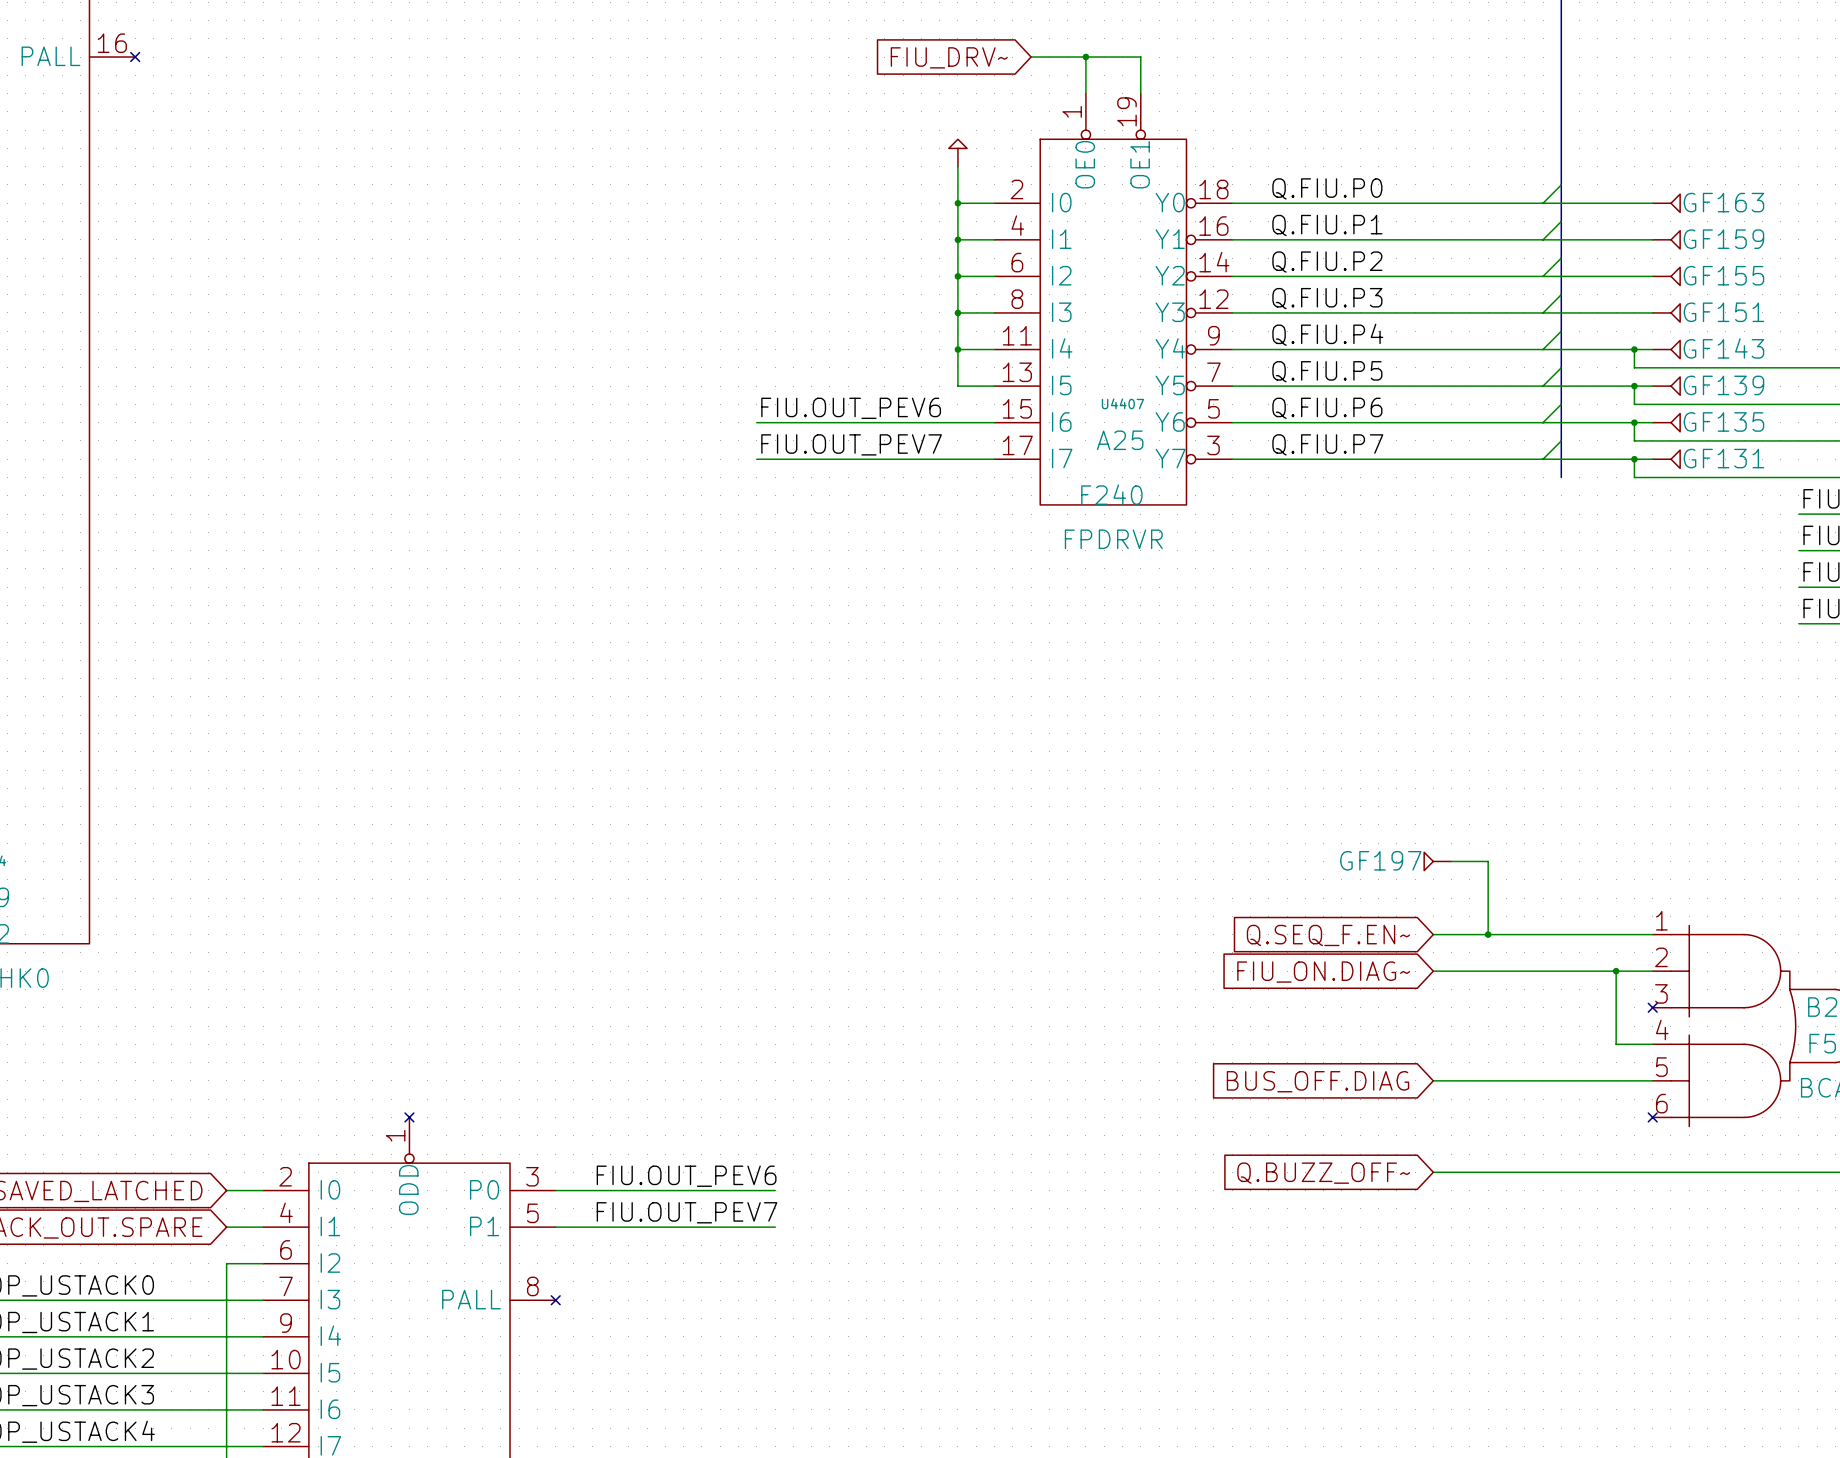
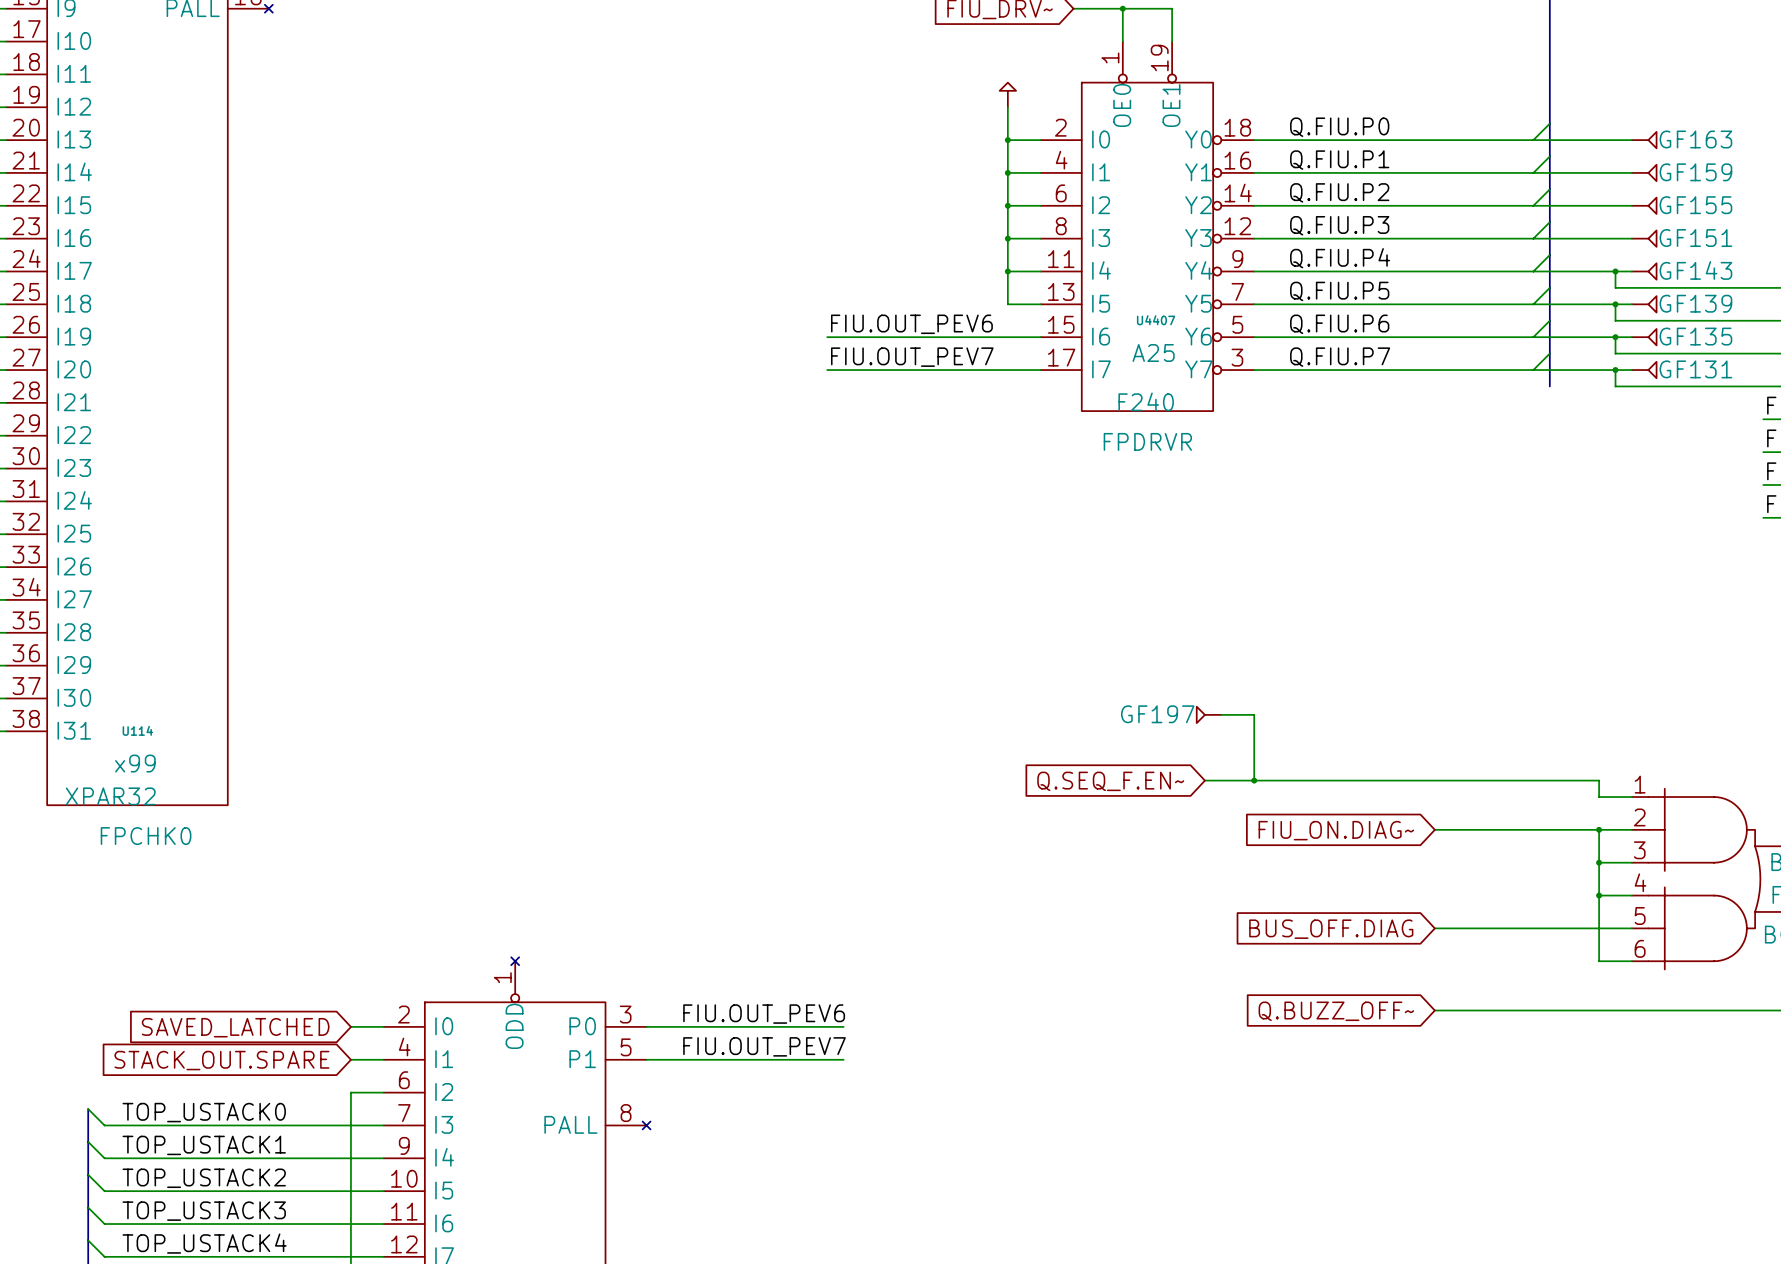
wire: none -> (1221, 714) (1254, 714) (1254, 780)
GF197 position: (1437, 861) -> (1208, 714)
wire: (1451, 861) (1488, 861) (1488, 934) -> none
junction: none -> (1254, 780)
global label: none -> Q.SEQ_F.EN~ (1110, 781)
wire: (1433, 934) (1616, 934) -> (1204, 780) (1599, 780) (1599, 797)
junction: (1488, 934) -> none
global label: Q.SEQ_F.EN~ (1328, 935) -> none
wire: none -> (1599, 862) (1631, 862)
junction: none -> (1599, 862)
no-connect mark: (1652, 1007) -> none
wire: none -> (1599, 895) (1599, 961) (1631, 961)
junction: none -> (1599, 895)
no-connect mark: (1652, 1117) -> none

